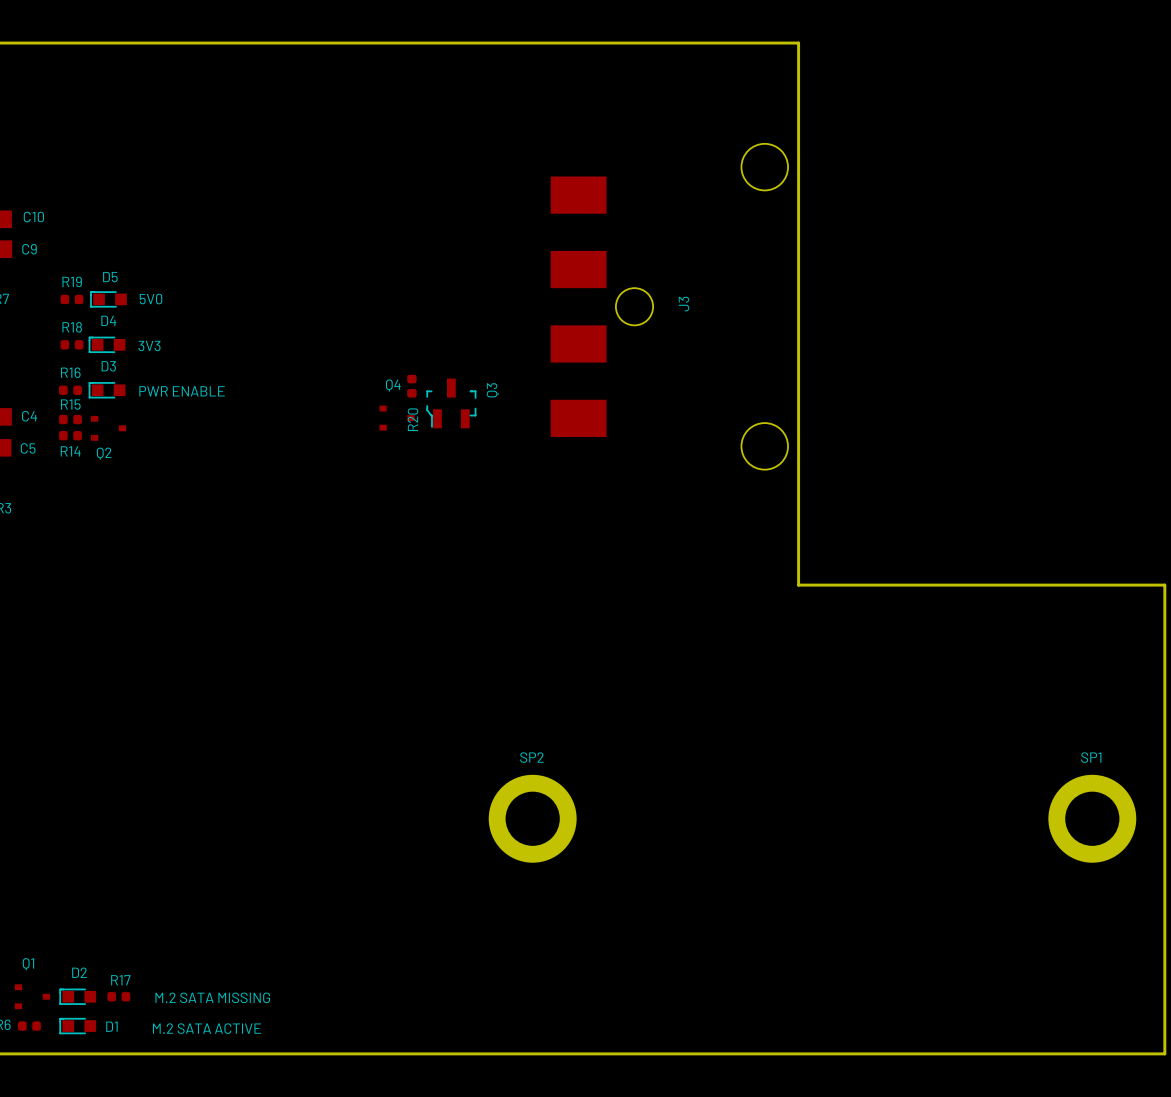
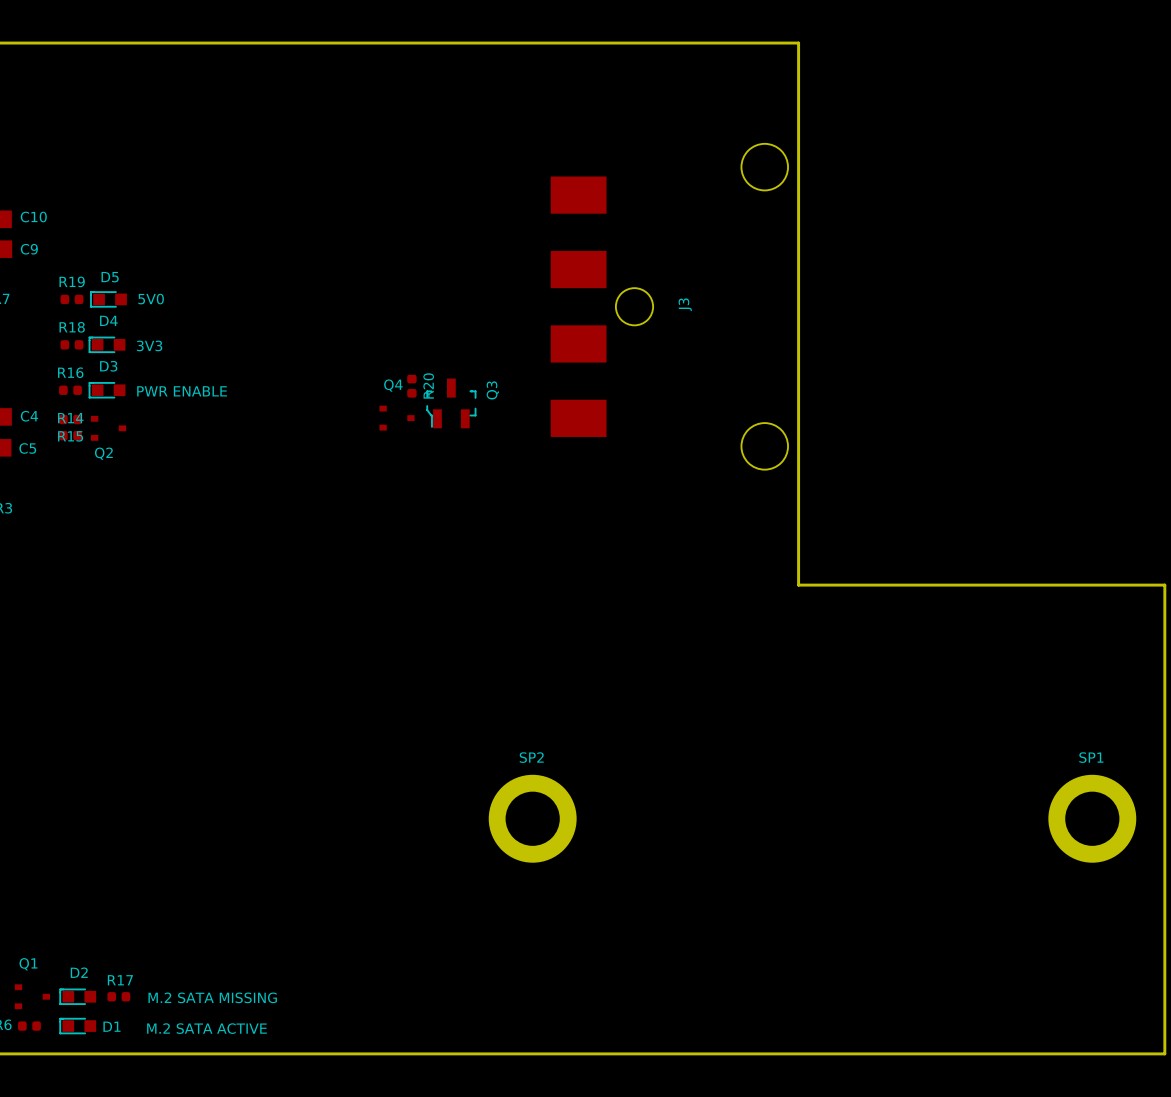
R15 name position: R15 (70, 404) -> R15 (70, 436)
R20 name position: R20 (413, 419) -> R20 (428, 385)
R14 name position: R14 (70, 451) -> R14 (70, 418)

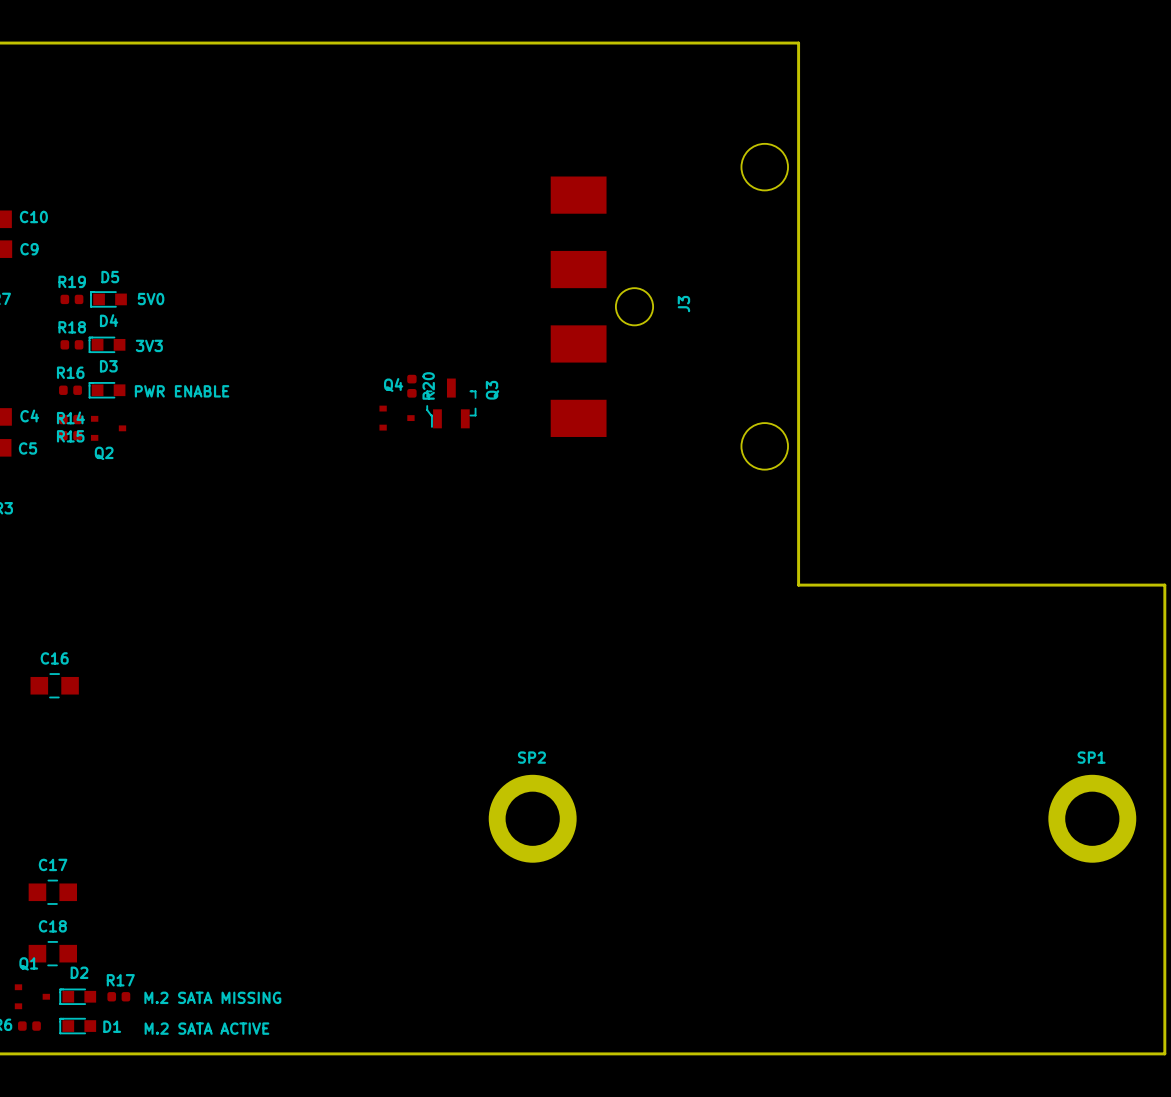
C16: none -> (54, 685)
C17: none -> (52, 892)
C18: none -> (52, 953)

